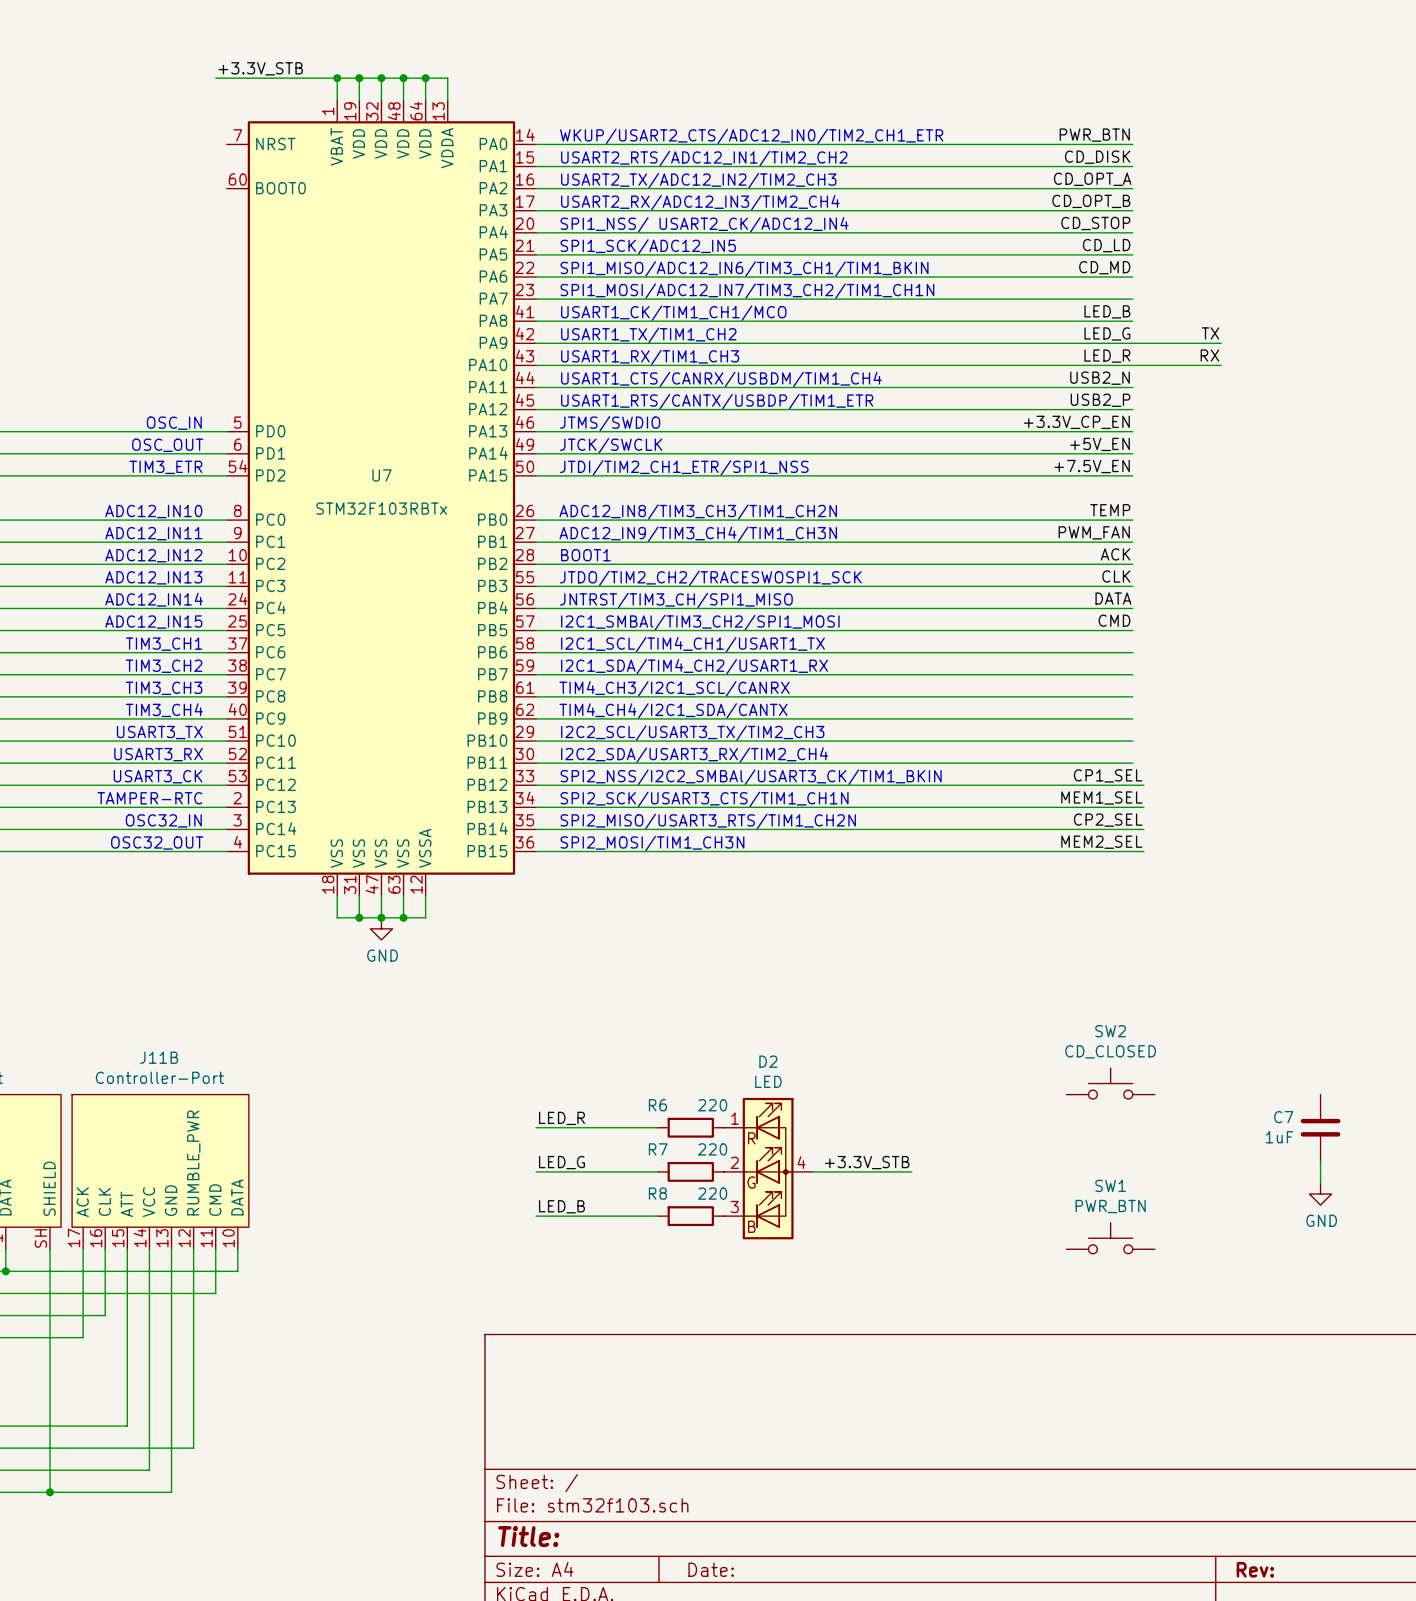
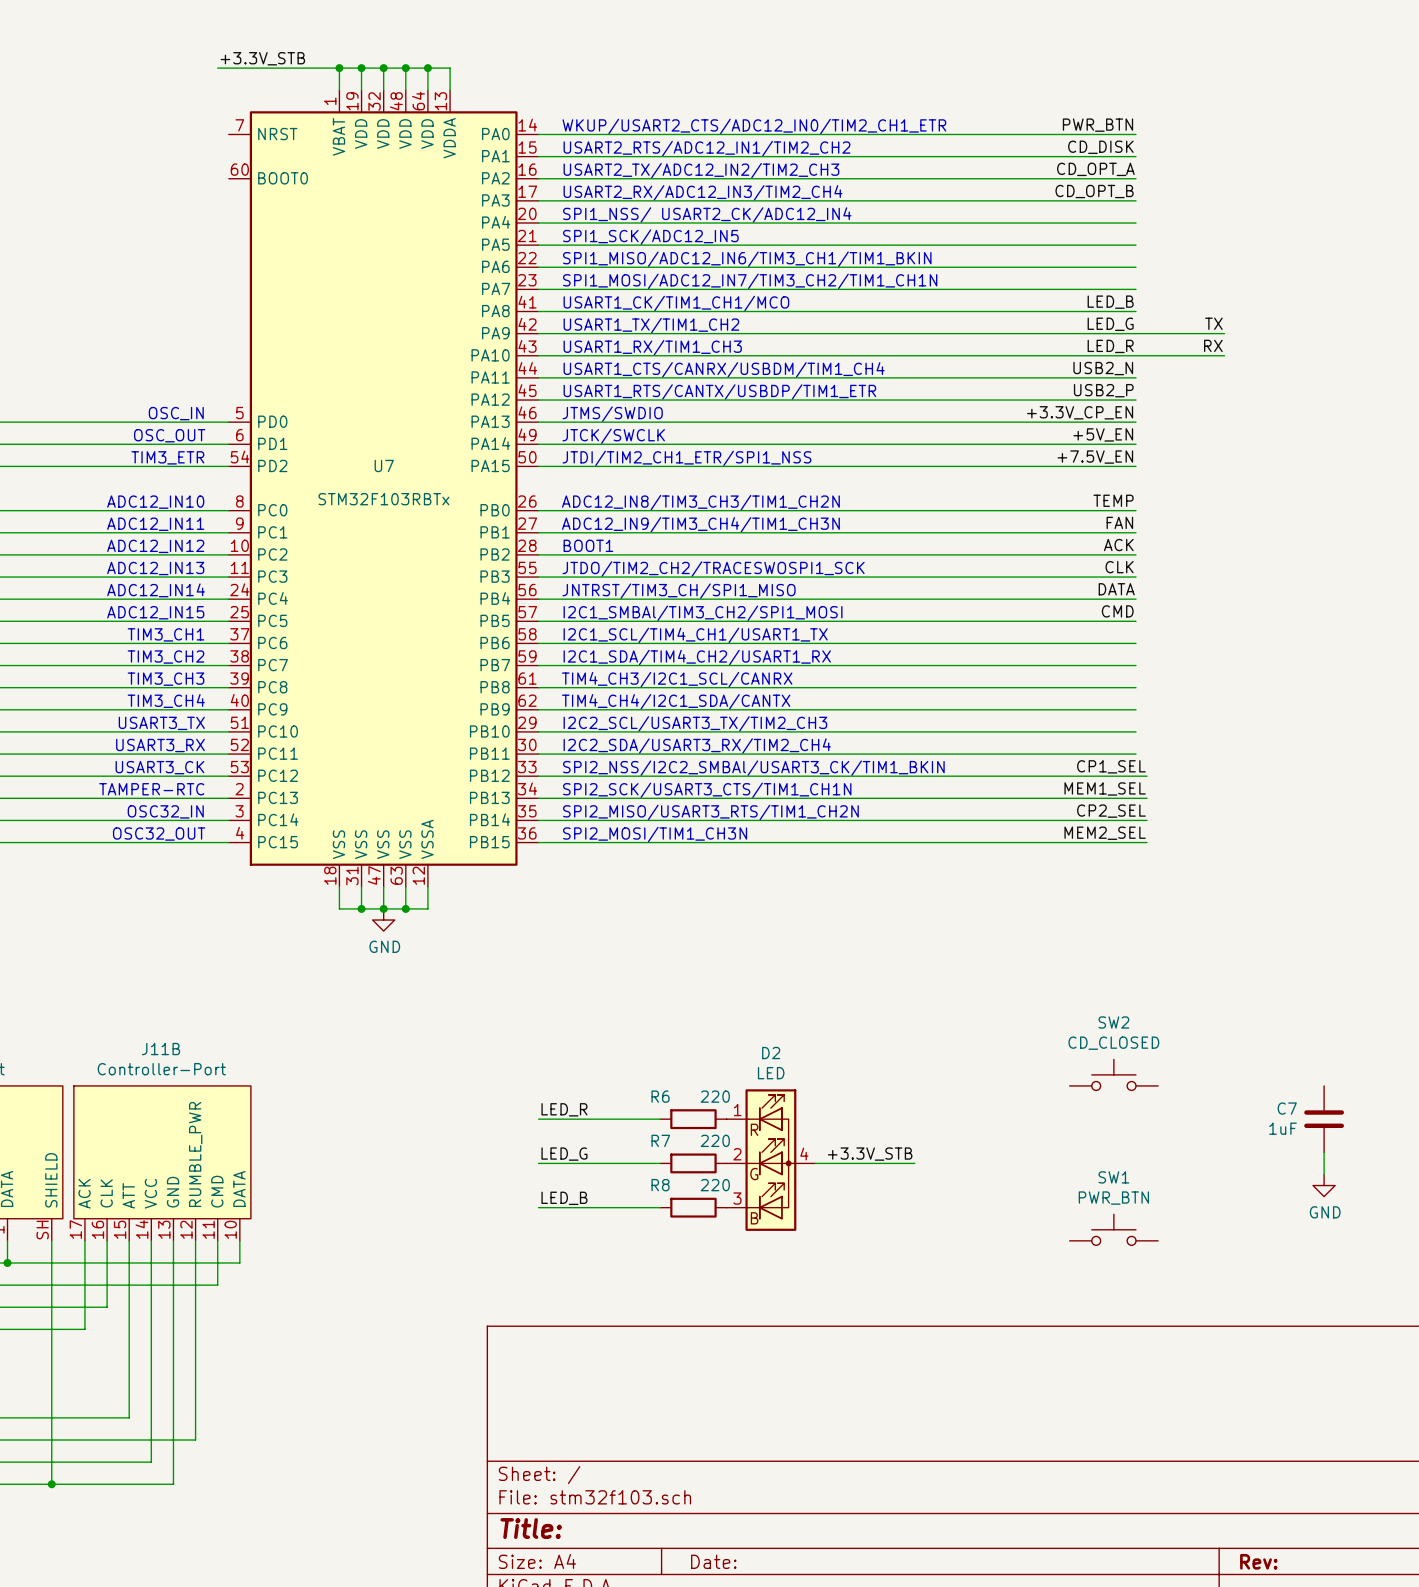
label: CD_STOP (1095, 223) -> none
label: CD_LD (1106, 245) -> none
label: CD_MD (1104, 267) -> none
label: PWM_FAN (1094, 532) -> FAN (1119, 522)

